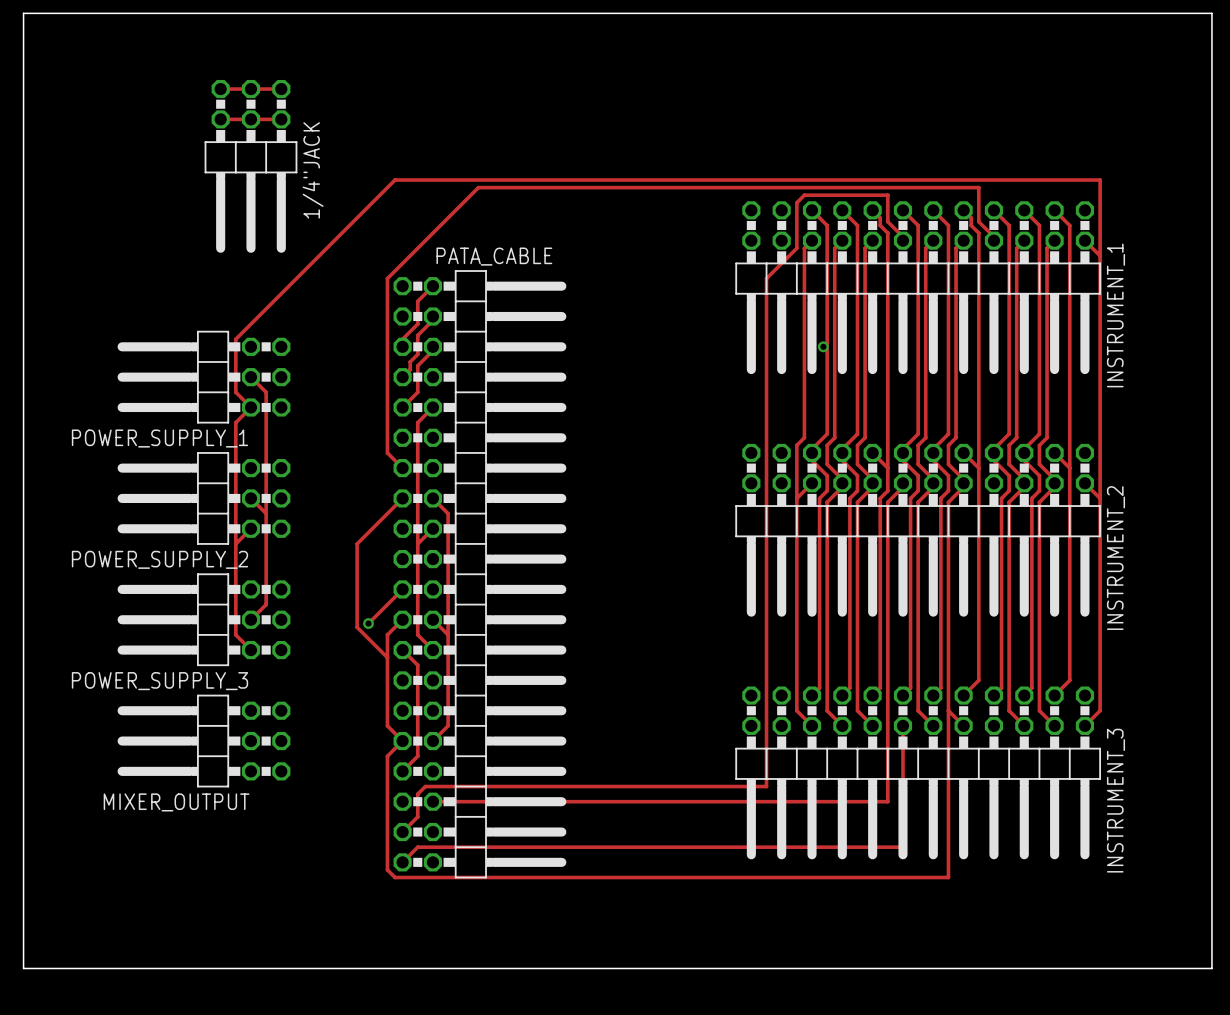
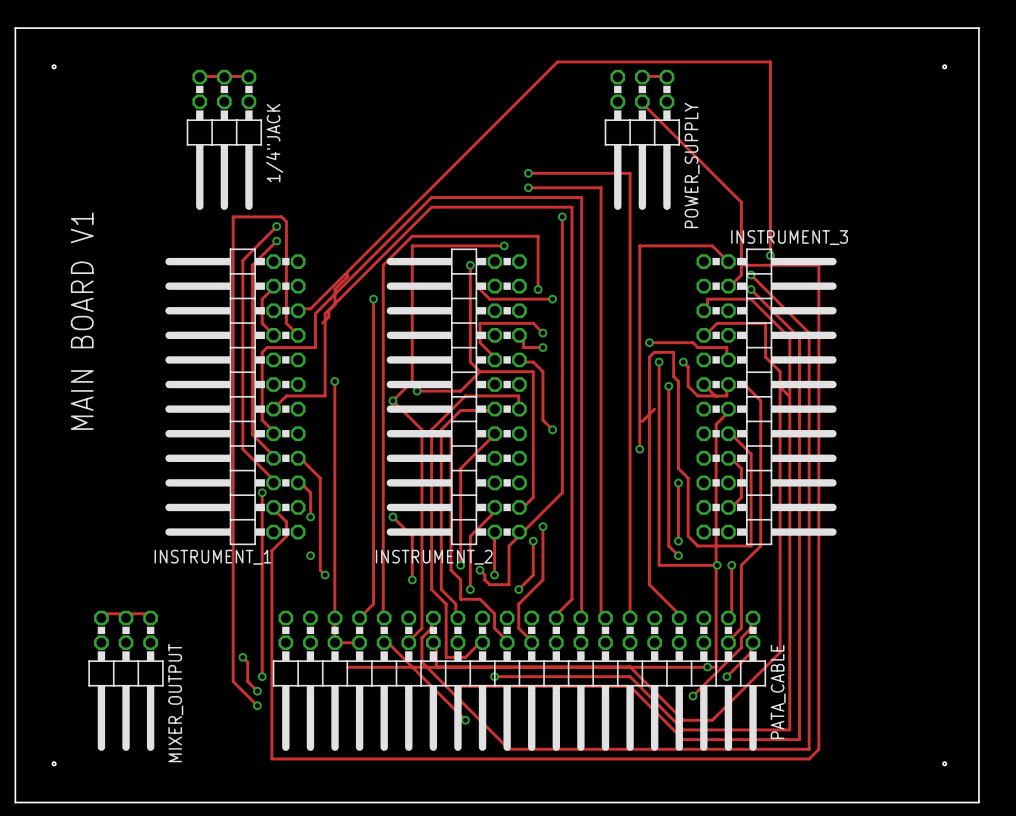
hole: none -> (54, 66)
hole: none -> (944, 66)
track: none -> (199, 77) (248, 77)
track: none -> (642, 77) (666, 77)
track: (220, 89) (281, 89) -> none
track: none -> (642, 101) (741, 202) (741, 274) (728, 286)
track: (220, 119) (281, 119) -> none
POWER_SUPPLY: none -> (642, 139)
1/4"JACK position: (250, 166) -> (224, 139)
track: none -> (528, 173) (630, 173) (630, 618)
via: none -> (528, 173)
track: none -> (528, 187) (601, 187) (601, 613) (605, 618)
via: none -> (528, 187)
track: (812, 210) (827, 225) (827, 434) (812, 449) (812, 460) (827, 475) (827, 490) (819, 498) (819, 687) (812, 695) -> none
track: (842, 210) (857, 225) (857, 434) (842, 449) (842, 460) (857, 475) (857, 490) (849, 498) (849, 687) (842, 695) -> none
track: (872, 210) (880, 217) (880, 225) (887, 233) (887, 490) (880, 498) (880, 687) (872, 695) -> none
track: (902, 210) (918, 225) (918, 434) (902, 449) (902, 460) (918, 475) (918, 490) (910, 498) (910, 687) (902, 695) -> none
track: (933, 210) (948, 225) (948, 434) (933, 449) (933, 460) (948, 475) (948, 490) (940, 498) (940, 687) (933, 695) -> none
track: (963, 210) (971, 217) (971, 225) (978, 233) (978, 680) (963, 695) -> none
track: (993, 210) (1009, 225) (1009, 434) (993, 449) (993, 460) (1009, 475) (1009, 490) (1001, 498) (1001, 687) (993, 695) -> none
track: (1024, 210) (1039, 225) (1039, 434) (1024, 449) (1024, 460) (1039, 475) (1039, 490) (1031, 498) (1031, 687) (1024, 695) -> none
track: (1054, 210) (1069, 225) (1069, 680) (1054, 695) -> none
track: (812, 240) (804, 248) (804, 437) (796, 445) (796, 710) (812, 725) -> none
track: (842, 240) (834, 248) (834, 437) (827, 445) (827, 464) (842, 479) (842, 487) (827, 502) (827, 710) (842, 725) -> none
track: (872, 240) (865, 248) (865, 437) (857, 445) (857, 464) (872, 479) (872, 487) (857, 502) (857, 710) (872, 725) -> none
track: (902, 240) (902, 236) (887, 221) (887, 195) (804, 195) (796, 202) (796, 248) (766, 278) (766, 786) (425, 786) (417, 794) (417, 816) (402, 832) -> none
track: (933, 240) (925, 248) (925, 437) (918, 445) (918, 464) (933, 479) (933, 487) (918, 502) (918, 710) (933, 725) -> none
track: (963, 240) (956, 248) (956, 437) (948, 445) (948, 464) (963, 479) (963, 487) (948, 502) (948, 877) (395, 877) (387, 869) (387, 756) (402, 741) (387, 725) (387, 634) (402, 619) -> none
track: (993, 240) (993, 236) (978, 221) (978, 187) (478, 187) (387, 278) (387, 452) (402, 468) -> none
track: (1024, 240) (1016, 248) (1016, 437) (1009, 445) (1009, 464) (1024, 479) (1024, 487) (1009, 502) (1009, 710) (1024, 725) -> none
track: (1054, 240) (1047, 248) (1047, 437) (1039, 445) (1039, 464) (1054, 479) (1054, 487) (1039, 502) (1039, 710) (1054, 725) -> none
track: (1084, 240) (1100, 255) -> none
track: none -> (562, 216) (562, 492) (523, 531) (519, 532) (518, 536) (509, 545) (509, 584) (489, 584) (480, 570)
via: none -> (562, 216)
track: none -> (276, 226) (242, 260) (242, 449) (271, 478) (273, 482)
via: none -> (276, 226)
track: none -> (276, 241) (252, 265) (252, 434) (271, 454) (273, 458)
via: none -> (276, 241)
track: none -> (504, 245) (412, 245) (412, 381) (392, 400) (421, 429) (421, 628) (408, 642)
via: none -> (504, 245)
track: (432, 286) (417, 301) (417, 324) (402, 339) (402, 346) -> none
INSTRUMENT_1 rotation: 0° (918, 287) -> 90° clockwise (235, 396)
INSTRUMENT_1 position: (918, 287) -> (235, 396)
track: none -> (770, 255) (770, 61) (557, 61) (310, 308) (298, 310)
via: none -> (770, 255)
track: none -> (728, 261) (712, 245) (639, 245) (639, 449)
track: none -> (470, 265) (470, 362) (480, 371)
via: none -> (470, 265)
track: none -> (741, 265) (818, 265) (818, 749) (809, 758) (271, 758) (271, 550) (286, 536) (286, 521) (273, 507)
track: none -> (751, 274) (809, 333) (809, 749) (509, 749) (421, 662) (421, 637) (431, 628) (431, 618) (433, 618)
via: none -> (751, 274)
track: none -> (273, 286) (262, 299) (262, 323) (273, 335)
track: none -> (480, 289) (489, 299) (552, 299)
track: none -> (538, 289) (538, 236) (412, 236) (383, 265) (384, 618)
via: none -> (538, 289)
track: none -> (751, 289) (799, 337) (799, 739) (683, 739) (630, 686) (460, 686)
via: none -> (751, 289)
track: (432, 346) (432, 350) (417, 365) (417, 392) (402, 407) -> none
via: (823, 346) -> none
track: none -> (373, 299) (373, 604) (359, 618)
via: none -> (373, 299)
via: none -> (552, 299)
track: none -> (703, 310) (707, 308) (707, 299) (751, 299) (789, 337) (789, 729) (683, 729) (630, 676) (494, 676)
text: none -> MAIN BOARD V1 (82, 321)
POWER_SUPPLY_1: (203, 377) -> none
track: (250, 377) (266, 392) (266, 604) (250, 619) -> none
track: none -> (542, 333) (533, 323) (480, 323) (480, 342) (494, 357) (494, 359)
via: none -> (542, 333)
track: none -> (298, 335) (286, 323) (286, 221) (281, 216) (233, 216) (233, 681) (257, 705)
track: none -> (519, 335) (523, 337) (523, 347) (542, 347)
track: none -> (703, 335) (717, 323) (765, 323) (765, 357) (780, 371) (780, 652) (712, 720) (683, 720) (630, 667) (436, 667) (436, 642) (433, 642)
track: none -> (649, 342) (693, 342) (697, 347) (726, 347) (728, 359)
via: none -> (649, 342)
track: (432, 407) (417, 422) (417, 634) (432, 650) -> none
via: none -> (542, 347)
track: none -> (519, 359) (533, 362) (542, 371) (542, 420) (552, 429)
track: none -> (659, 362) (659, 565) (717, 565)
via: none -> (659, 362)
track: none -> (683, 362) (688, 366) (688, 386) (697, 395) (726, 395) (728, 384)
via: none -> (683, 362)
track: none -> (480, 371) (460, 391) (417, 391)
track: none -> (480, 371) (533, 371) (533, 497) (523, 507) (519, 507)
track: none -> (334, 381) (335, 642) (359, 642)
via: none -> (334, 381)
track: (1054, 452) (1069, 468) -> none
track: none -> (668, 386) (668, 545) (678, 555)
via: none -> (668, 386)
track: none -> (746, 386) (760, 400) (760, 545) (741, 565) (741, 628) (728, 642)
via: none -> (417, 391)
via: none -> (392, 400)
track: none -> (273, 409) (286, 395) (325, 395) (325, 313) (431, 207) (571, 207) (571, 599) (557, 613) (556, 618)
track: none -> (494, 409) (460, 410) (441, 429) (441, 589) (455, 604) (457, 618)
track: none -> (519, 409) (518, 395) (465, 395) (431, 429) (431, 589) (446, 604) (446, 657) (465, 657) (480, 642) (482, 642)
track: (1084, 483) (1100, 498) -> none
POWER_SUPPLY_2: (203, 498) -> none
track: (250, 498) (266, 513) -> none
track: (402, 498) (357, 543) (357, 627) (387, 657) -> none
track: (432, 498) (448, 513) (448, 725) (432, 741) -> none
via: none -> (552, 429)
track: none -> (273, 433) (262, 420) (262, 352) (267, 347) (315, 347) (315, 313) (431, 197) (581, 197) (580, 618)
track: none -> (494, 433) (460, 468) (460, 565)
track: none -> (728, 433) (751, 454) (751, 545) (697, 545) (688, 536) (688, 478) (678, 468) (678, 381) (673, 376) (673, 352) (654, 352) (649, 357) (649, 584) (678, 613) (679, 618)
track: none -> (450, 434) (450, 570) (460, 579) (460, 599) (480, 599) (494, 613) (494, 628) (507, 642)
track: (250, 528) (235, 543) -> none
track: (432, 528) (417, 543) -> none
INSTRUMENT_2 rotation: 0° (918, 530) -> 90° clockwise (456, 396)
INSTRUMENT_2 position: (918, 530) -> (456, 396)
via: none -> (639, 449)
track: none -> (298, 458) (320, 478) (320, 570) (325, 575)
track: none -> (728, 458) (731, 458) (741, 468) (741, 497) (731, 507) (728, 507)
track: none -> (298, 482) (300, 483) (310, 492) (310, 516)
PATA_CABLE rotation: 0° (479, 574) -> 90° clockwise (519, 680)
track: none -> (678, 483) (678, 541)
via: none -> (678, 483)
track: none -> (262, 492) (262, 676)
via: none -> (262, 492)
track: (402, 589) (368, 623) -> none
track: none -> (494, 507) (494, 512) (470, 536) (470, 589)
track: none -> (392, 516) (412, 536) (412, 579)
via: none -> (392, 516)
POWER_SUPPLY_3: (203, 619) -> none
track: (432, 619) (448, 634) -> none
via position: (368, 623) -> (310, 516)
track: none -> (542, 526) (542, 579) (518, 604) (518, 628) (531, 642)
via: none -> (542, 526)
track: none -> (494, 532) (494, 575)
track: none -> (533, 541) (533, 575) (518, 589)
via: none -> (533, 541)
via: none -> (678, 541)
track: (250, 650) (235, 634) (235, 422) (250, 407) (235, 392) (235, 339) (395, 180) (1100, 180) (1100, 710) (1084, 725) -> none
track: (402, 650) (417, 665) (417, 756) (402, 771) -> none
via: none -> (310, 555)
via: none -> (678, 555)
via: none -> (460, 565)
via: none -> (717, 565)
track: none -> (731, 565) (731, 613) (728, 618)
via: none -> (731, 565)
via: none -> (480, 570)
via: none -> (325, 575)
via: none -> (494, 575)
via: none -> (412, 579)
via: none -> (470, 589)
via: none -> (518, 589)
track: (948, 710) (963, 725) -> none
track: (902, 725) (902, 847) (417, 847) (402, 862) -> none
track: none -> (101, 618) (102, 613) (121, 613) (126, 618) (126, 613) (146, 613) (150, 618)
MIXER_OUTPUT rotation: 0° (203, 741) -> 90° counterclockwise (126, 680)
track: none -> (753, 618) (751, 618) (751, 628) (741, 637) (741, 647) (693, 696)
track: none -> (384, 642) (388, 642) (465, 720)
track: none -> (753, 642) (751, 642) (751, 652) (726, 676)
INSTRUMENT_3 rotation: 0° (918, 772) -> 90° counterclockwise (766, 396)
INSTRUMENT_3 position: (918, 772) -> (766, 396)
track: none -> (242, 657) (247, 662) (247, 681) (257, 691)
via: none -> (242, 657)
via: none -> (707, 667)
via: none -> (262, 676)
via: none -> (494, 676)
via: none -> (726, 676)
via: none -> (257, 691)
via: none -> (693, 696)
via: none -> (257, 705)
via: none -> (465, 720)
hole: none -> (54, 763)
hole: none -> (944, 763)

